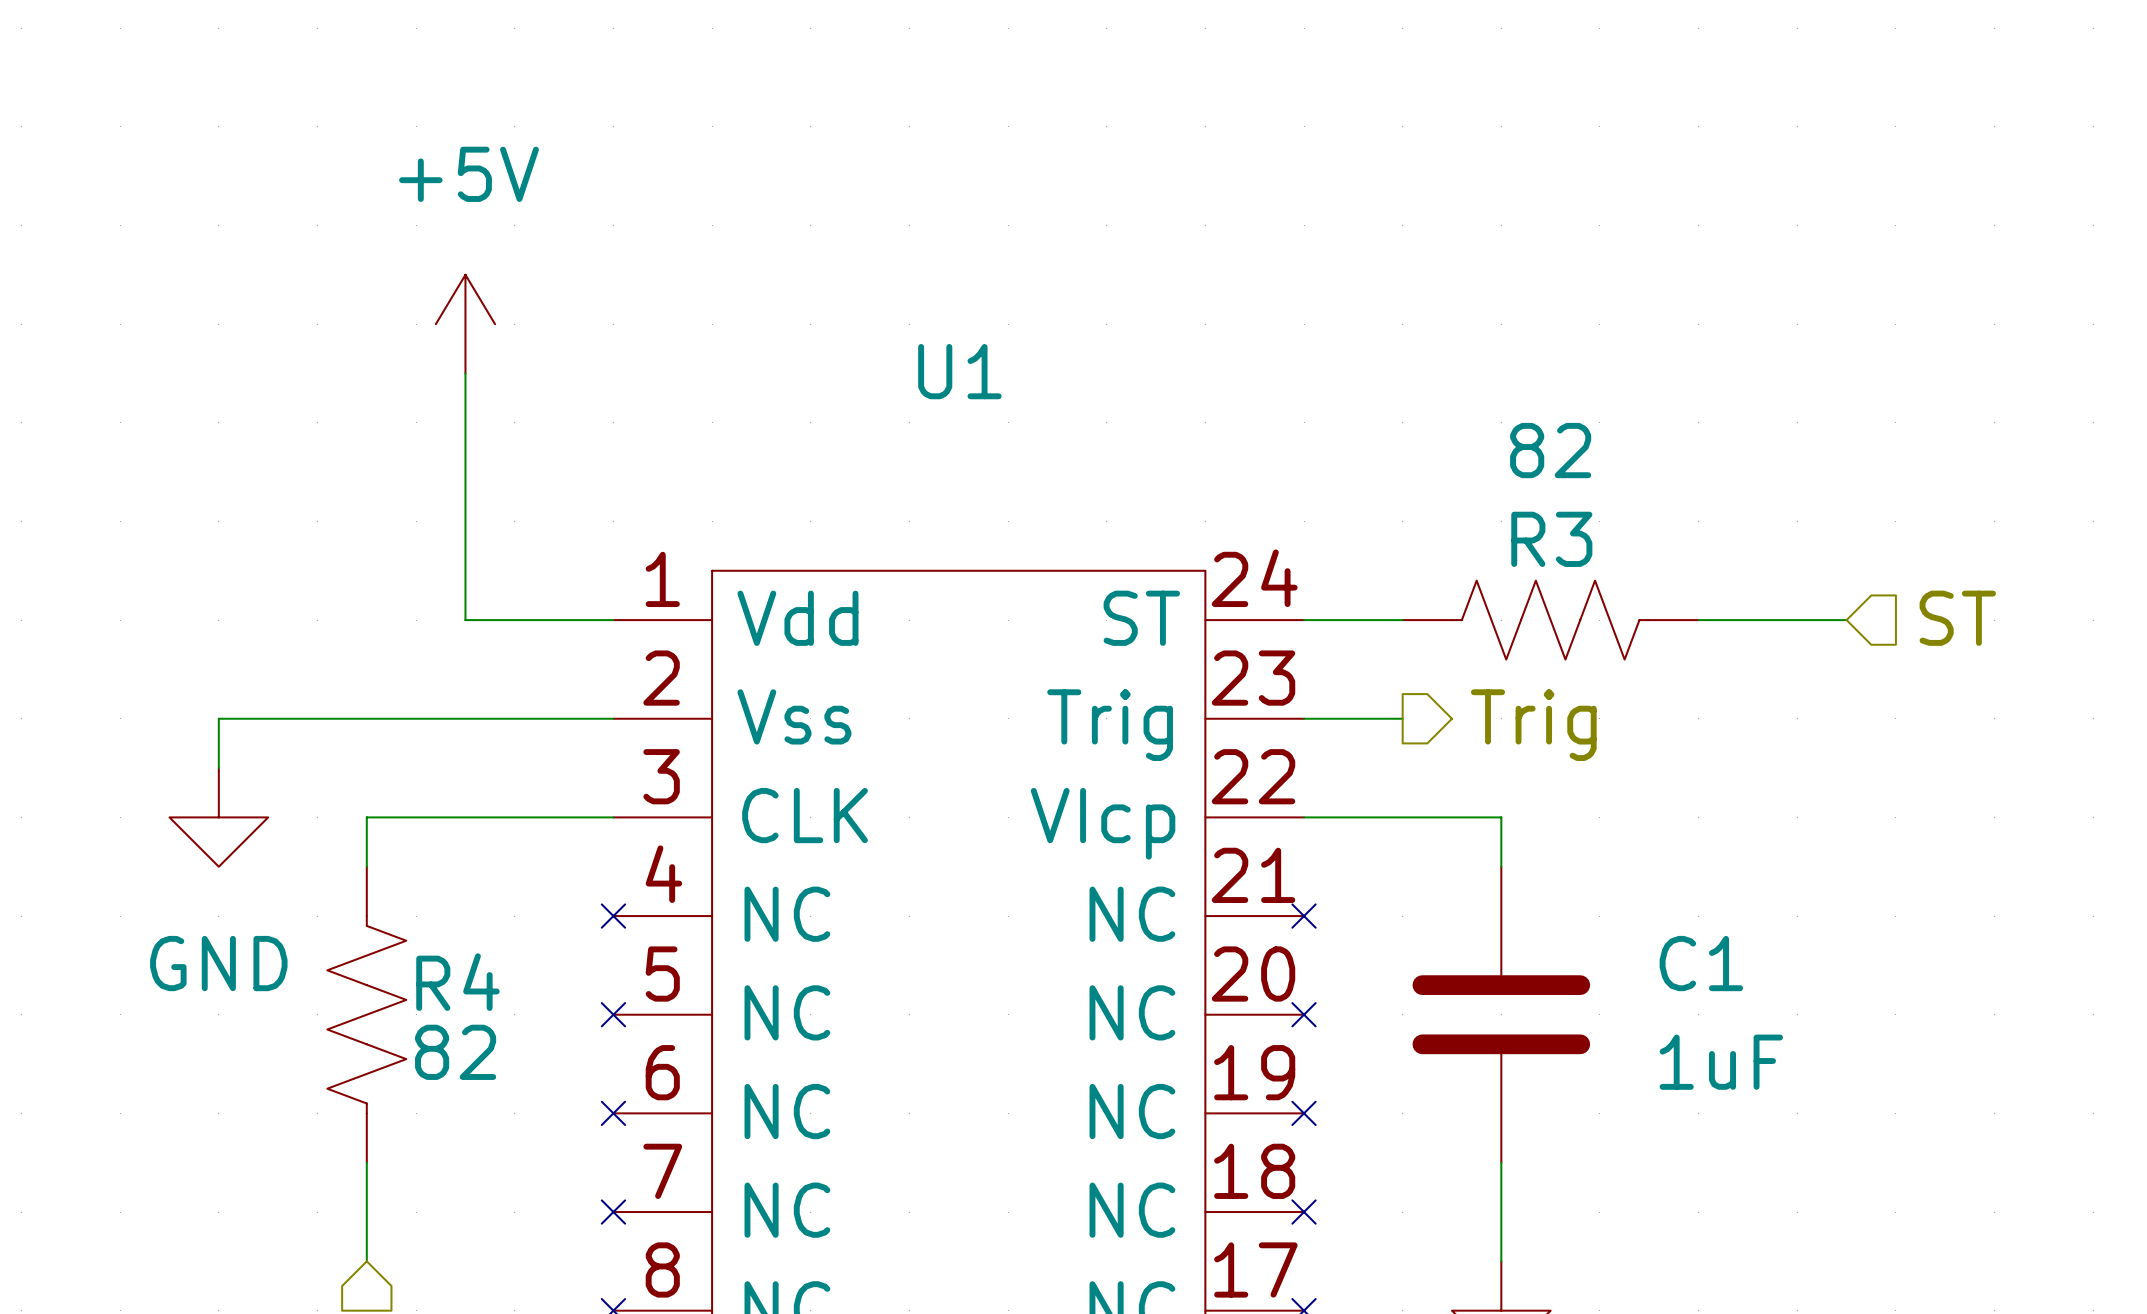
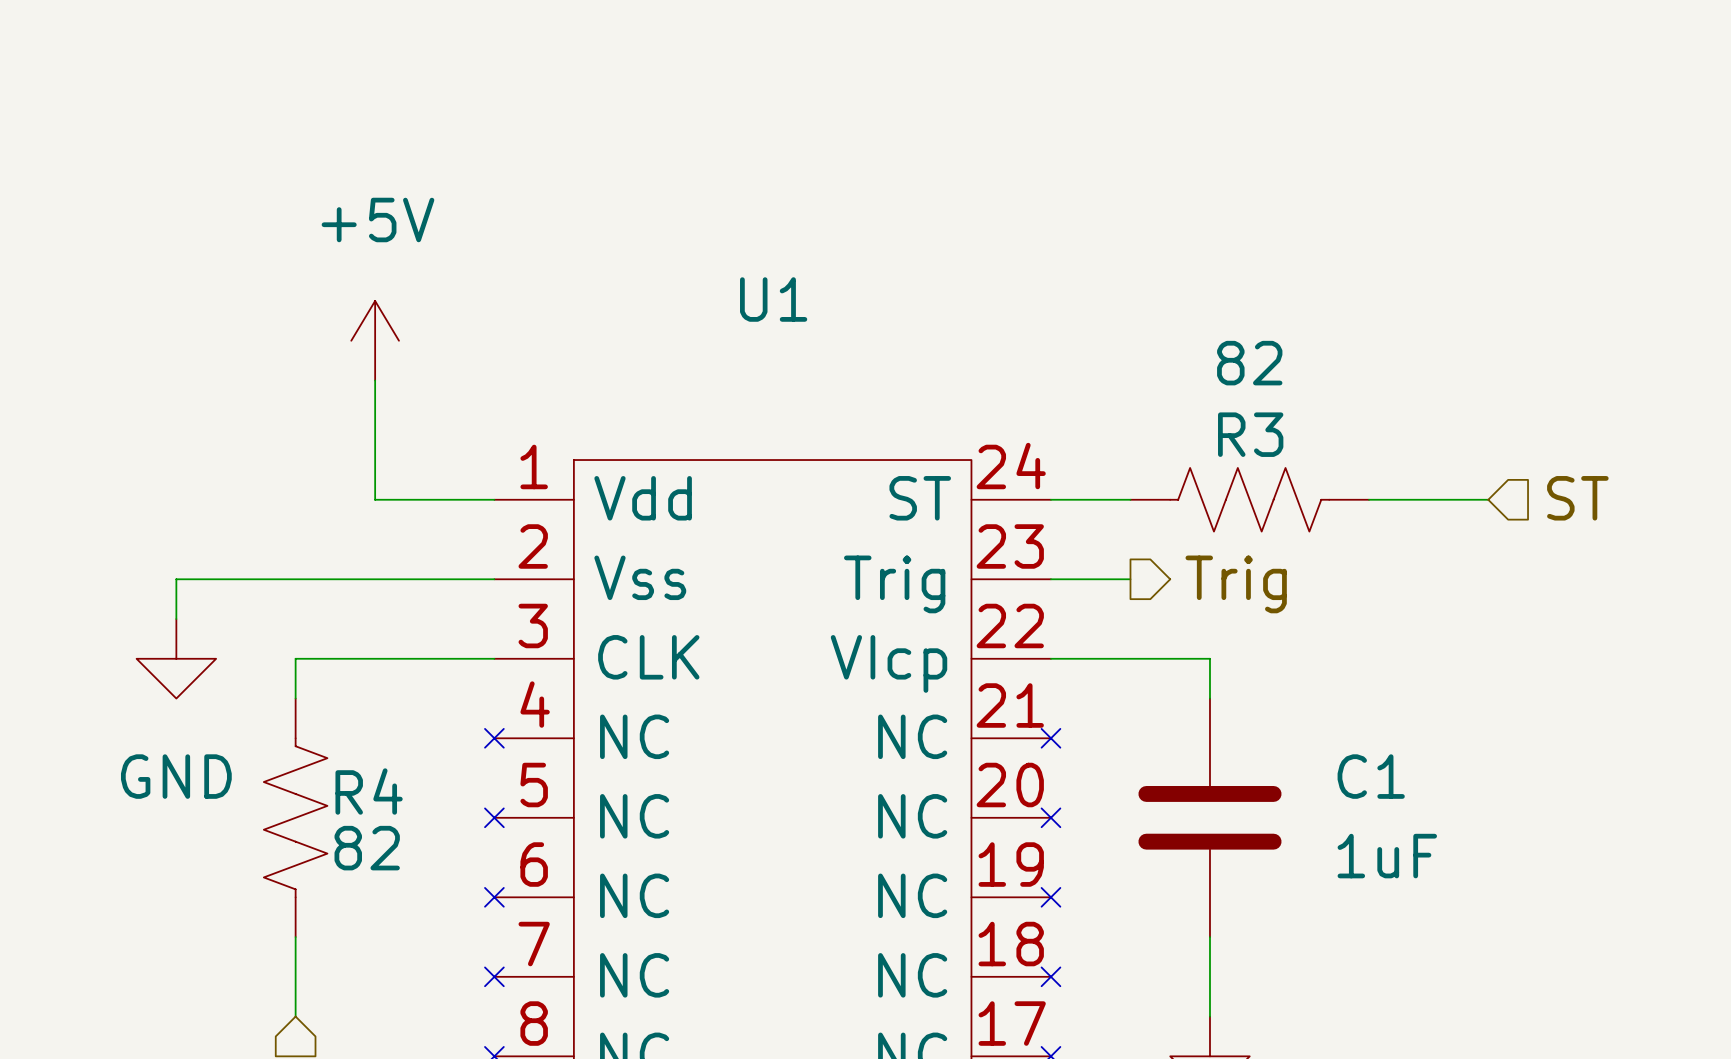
power symbol position: +5V (465, 324) -> +5V (375, 340)

